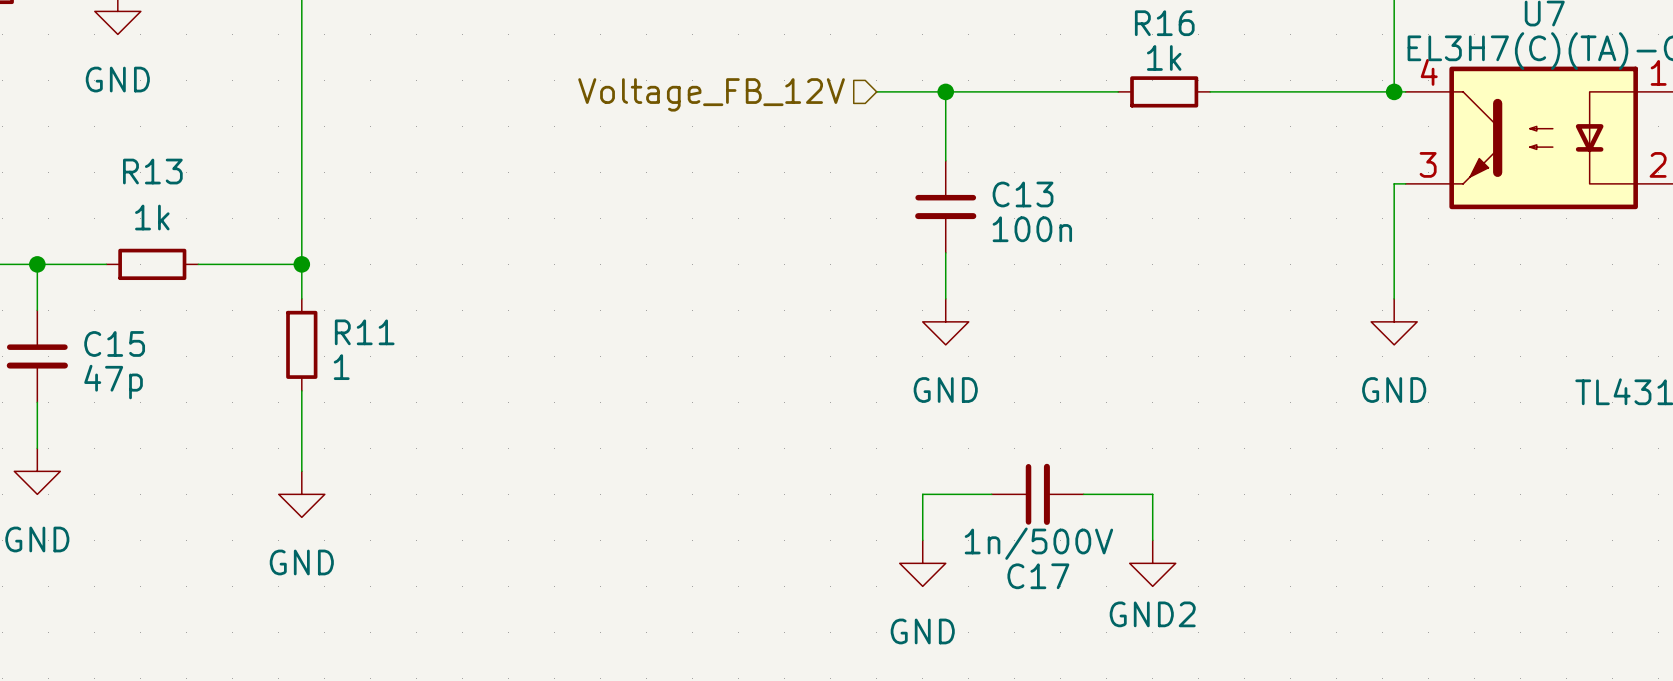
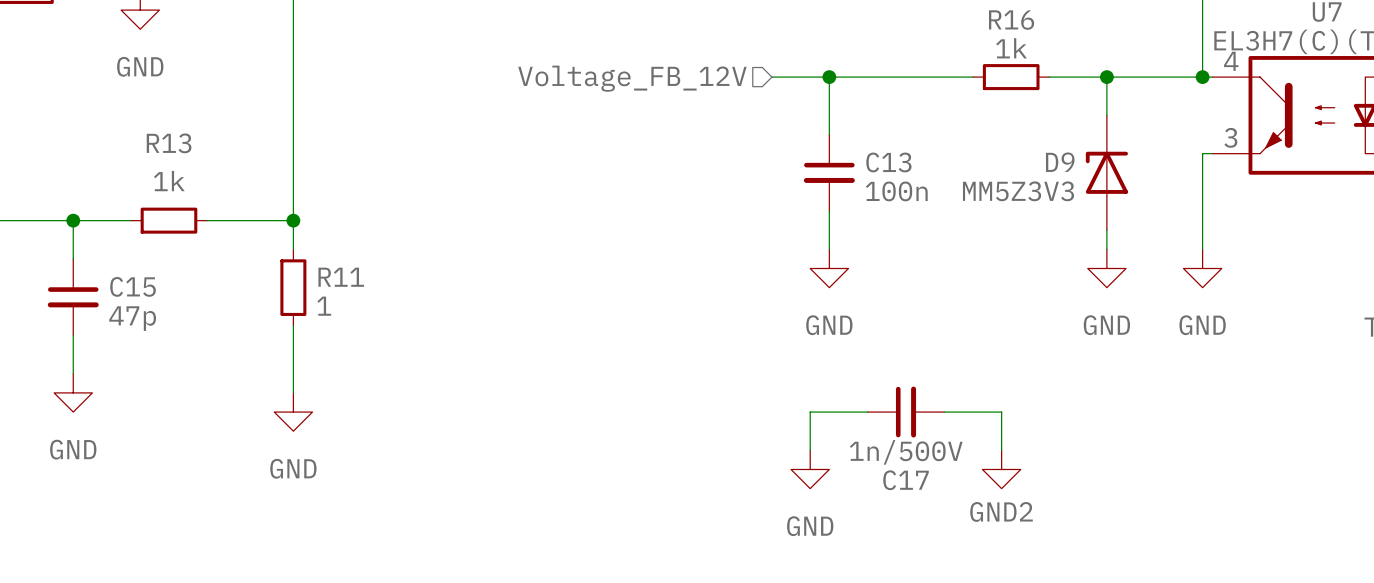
wire: none -> (1106, 77) (1106, 115)
junction: none -> (1106, 77)
D9: none -> MM5Z3V3 (1106, 172)
wire: none -> (1106, 230) (1106, 249)
power symbol: none -> GND (1106, 268)

